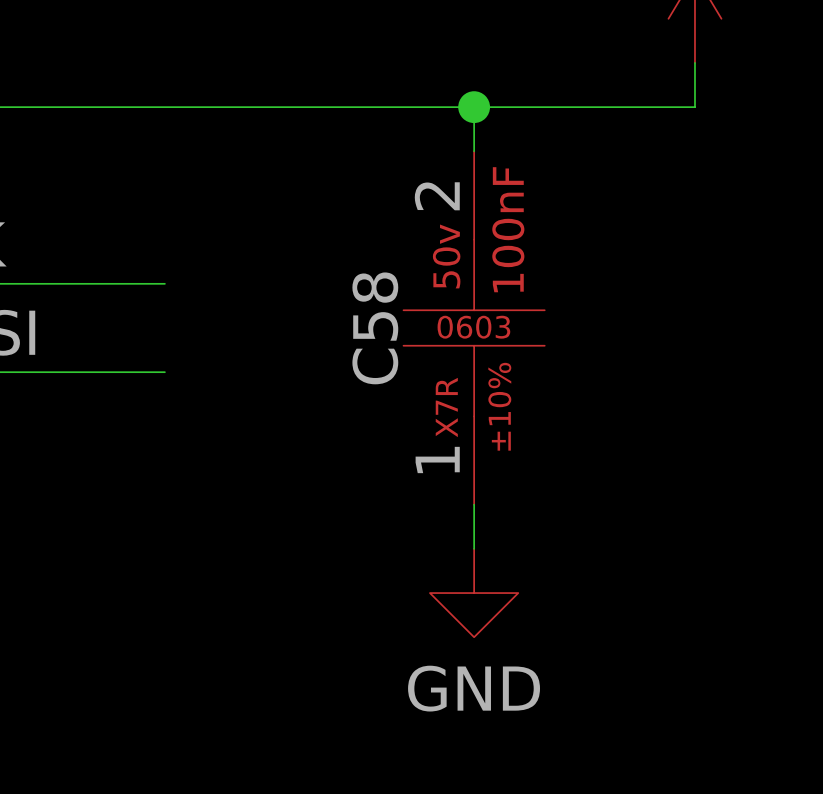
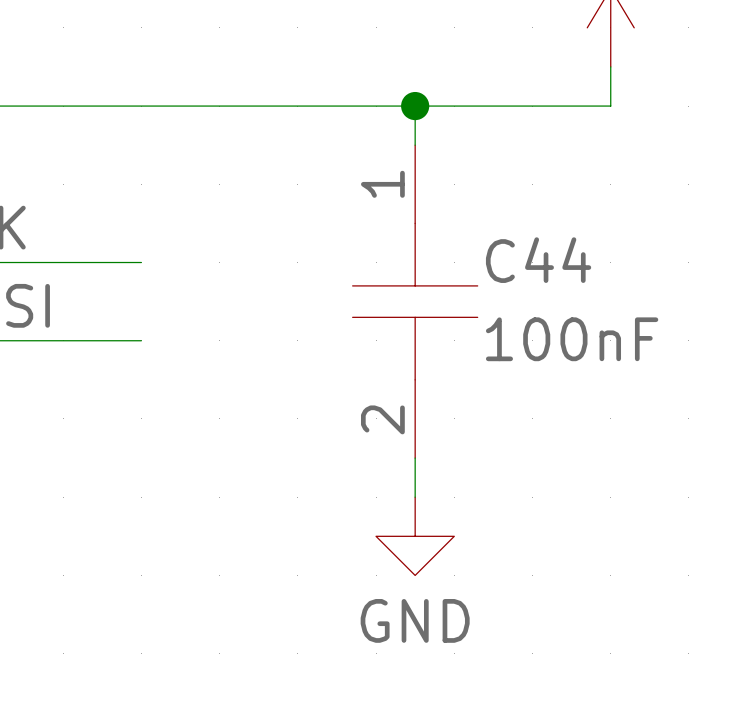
C58 pin number: 2 (437, 196) -> 1 (382, 184)
C58 text: 100nF (508, 229) -> none
C58 text: 50v (446, 256) -> none
C58 text: 0603 (473, 327) -> none
C58 name: C58 (375, 328) -> C44 (538, 260)
C58 text: none -> 100nF (572, 339)
C58 text: ±10% (499, 406) -> none
C58 text: X7R (446, 407) -> none
C58 pin number: 1 (437, 459) -> 2 (382, 419)

